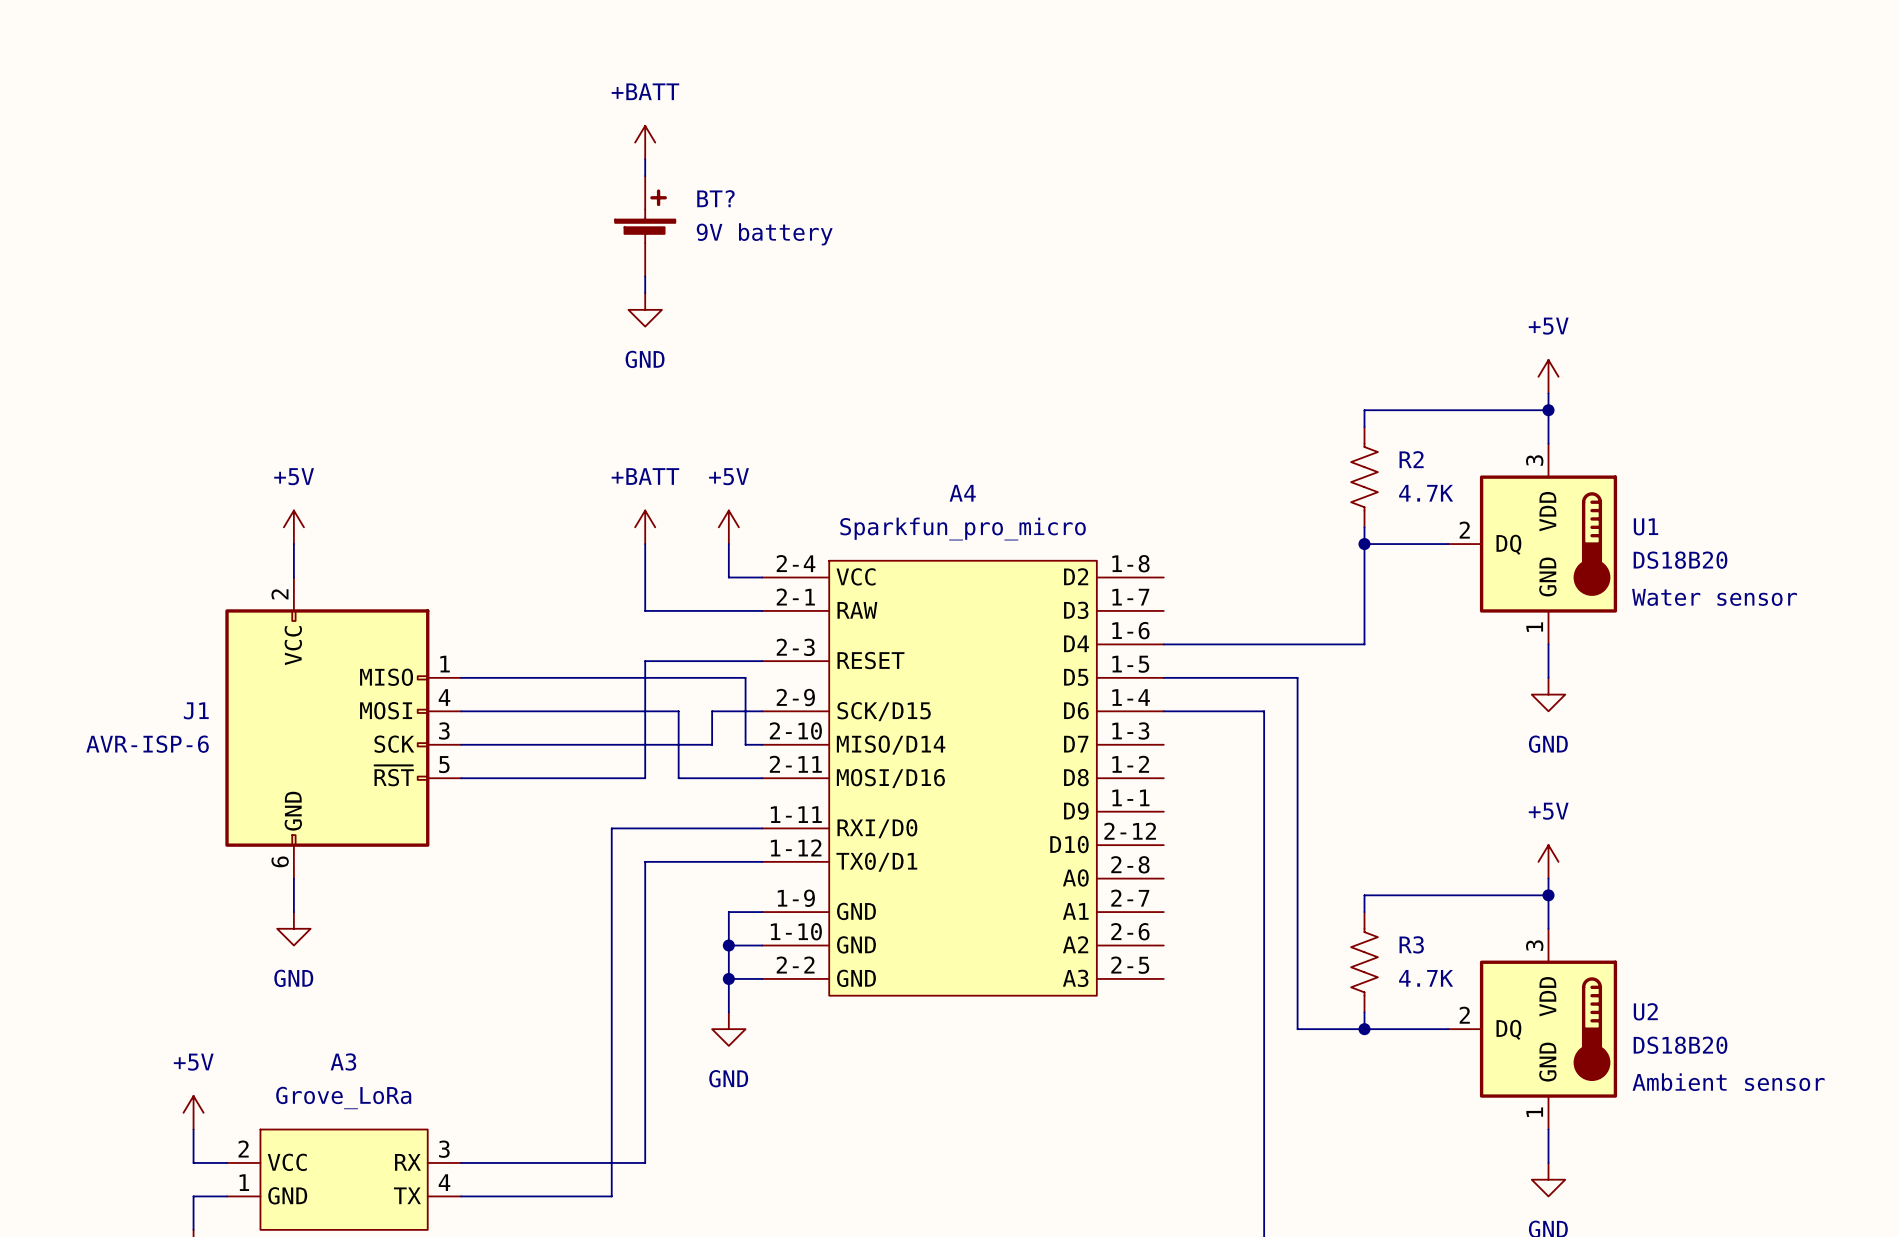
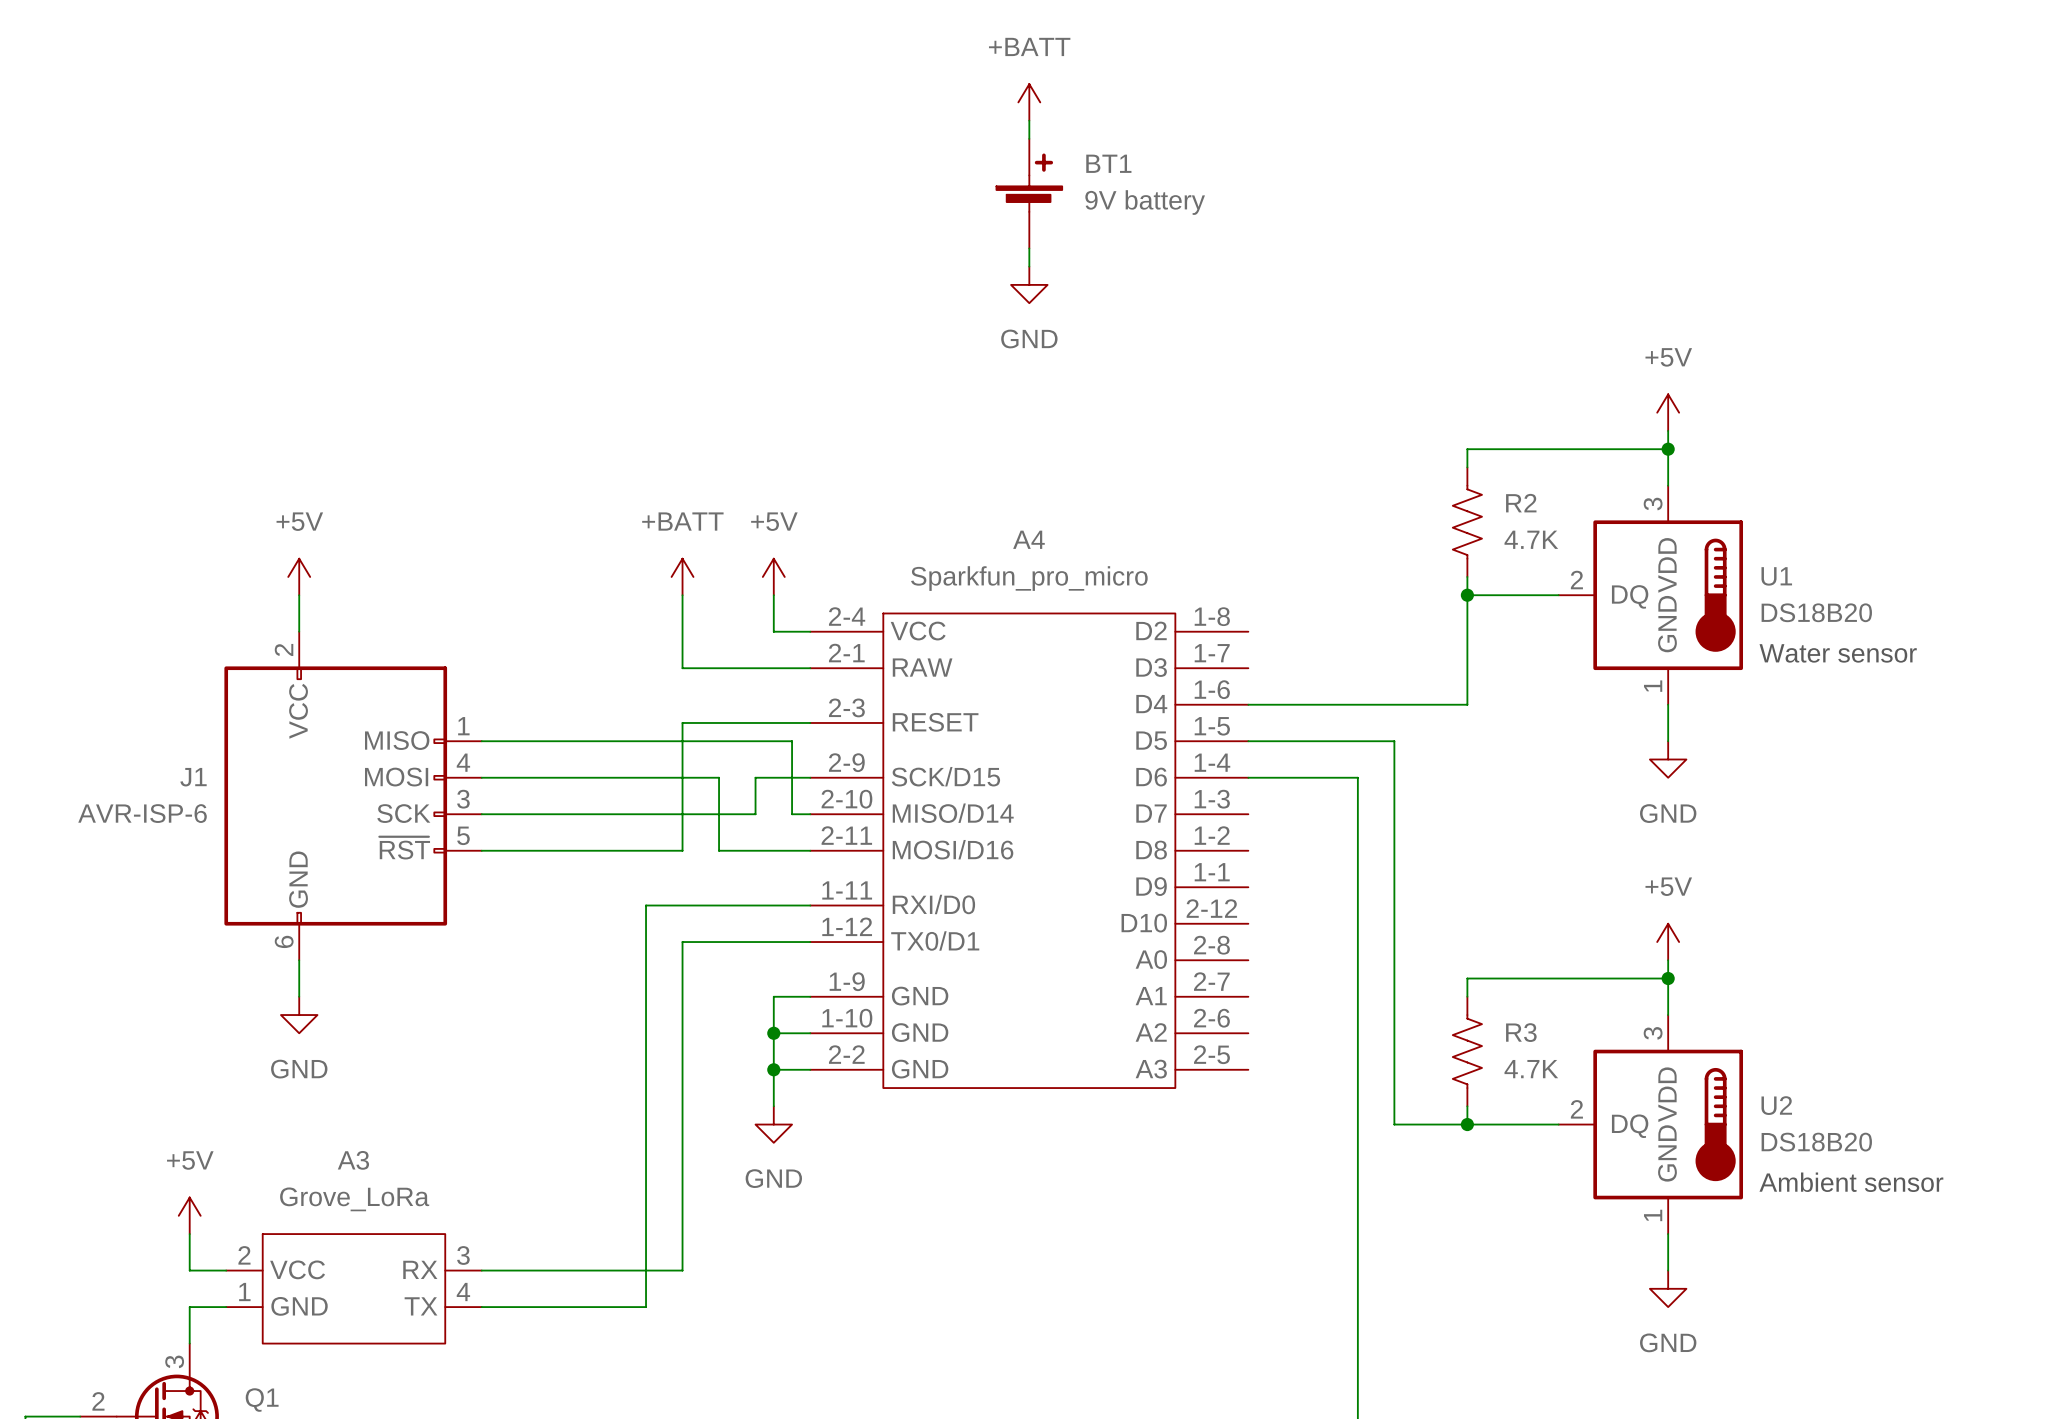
power symbol position: +BATT (645, 142) -> +BATT (1029, 102)
wire: (645, 159) (645, 176) -> (1029, 120) (1029, 138)
BT1: none -> 9V battery (1029, 193)
BT?: 9V battery (645, 226) -> none
wire: (645, 276) (645, 293) -> (1029, 248) (1029, 266)
power symbol position: GND (645, 309) -> GND (1029, 284)

